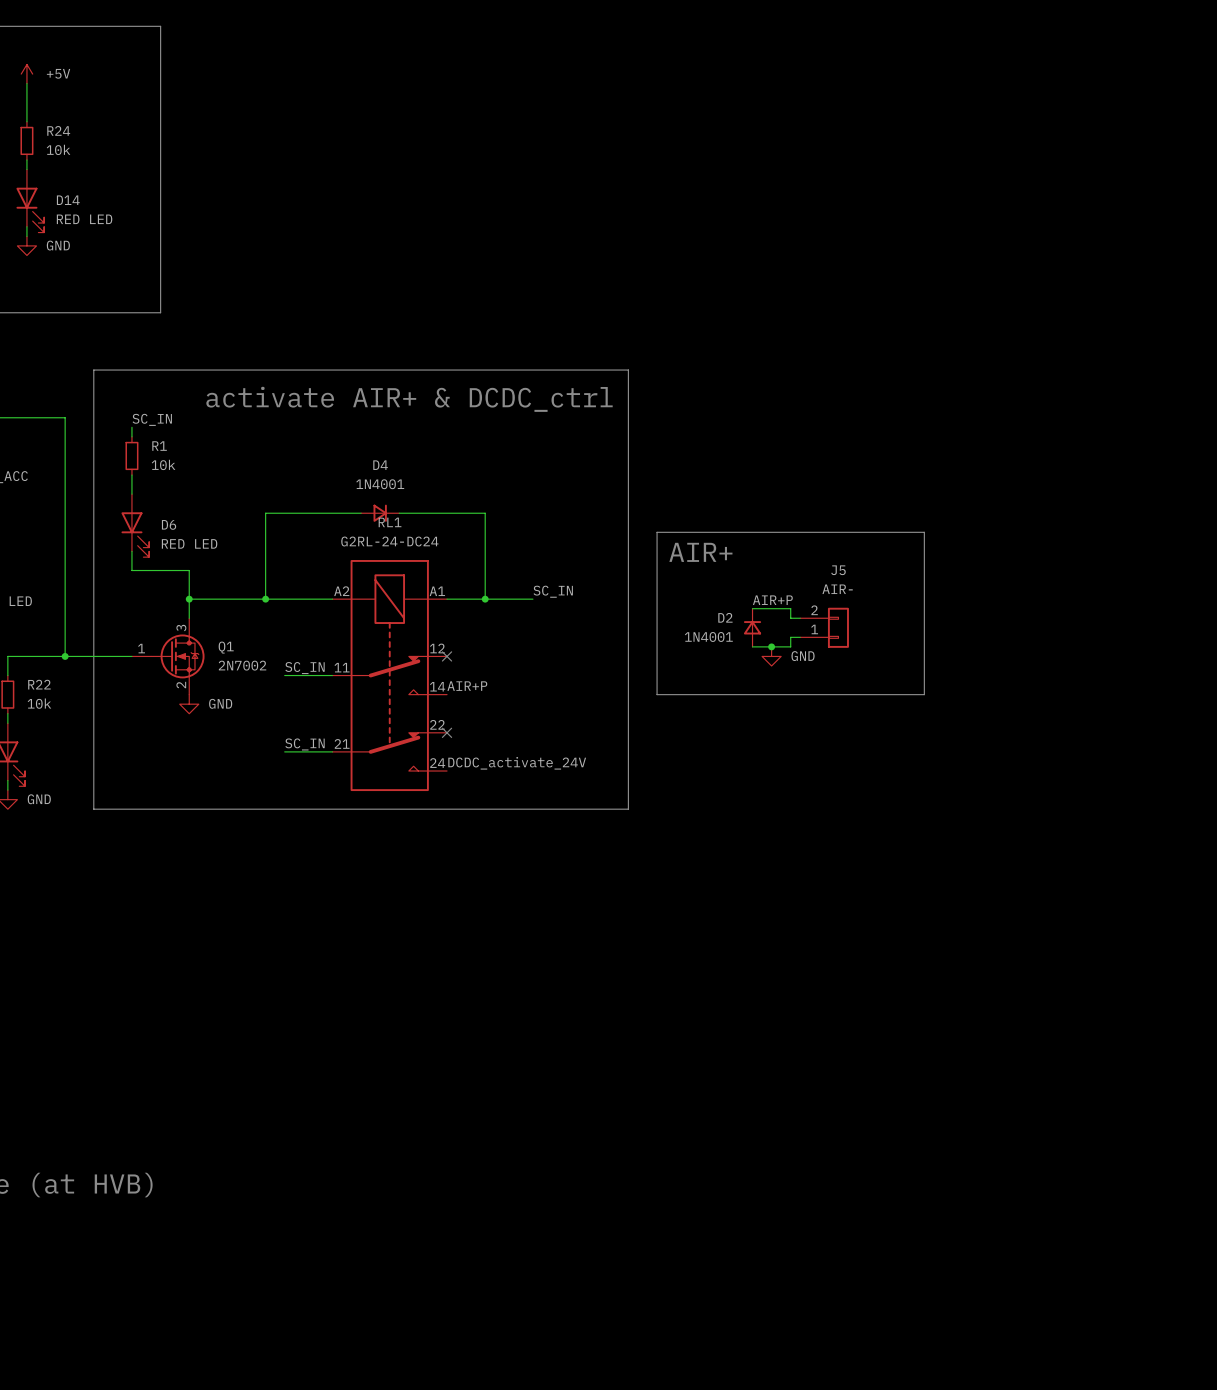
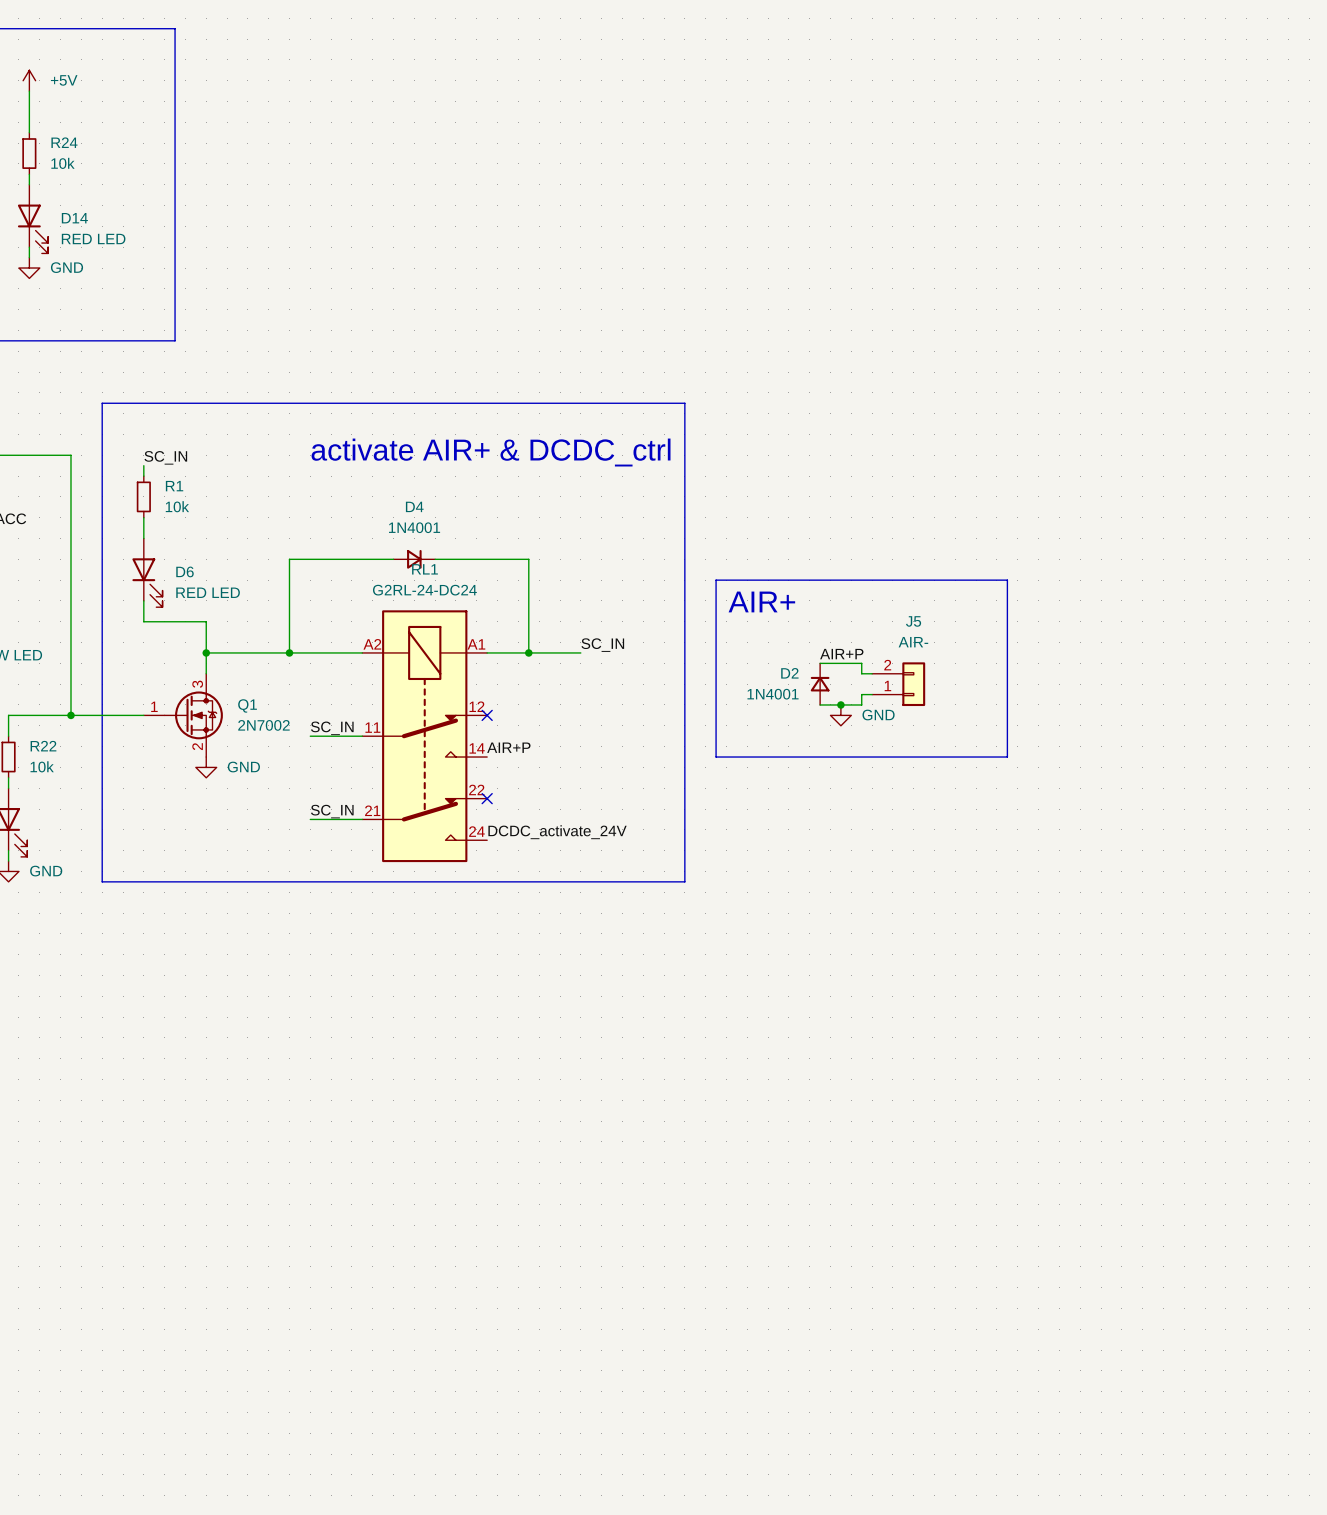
text position: activate AIR+ & DCDC_ctrl (409, 399) -> activate AIR+ & DCDC_ctrl (491, 452)

